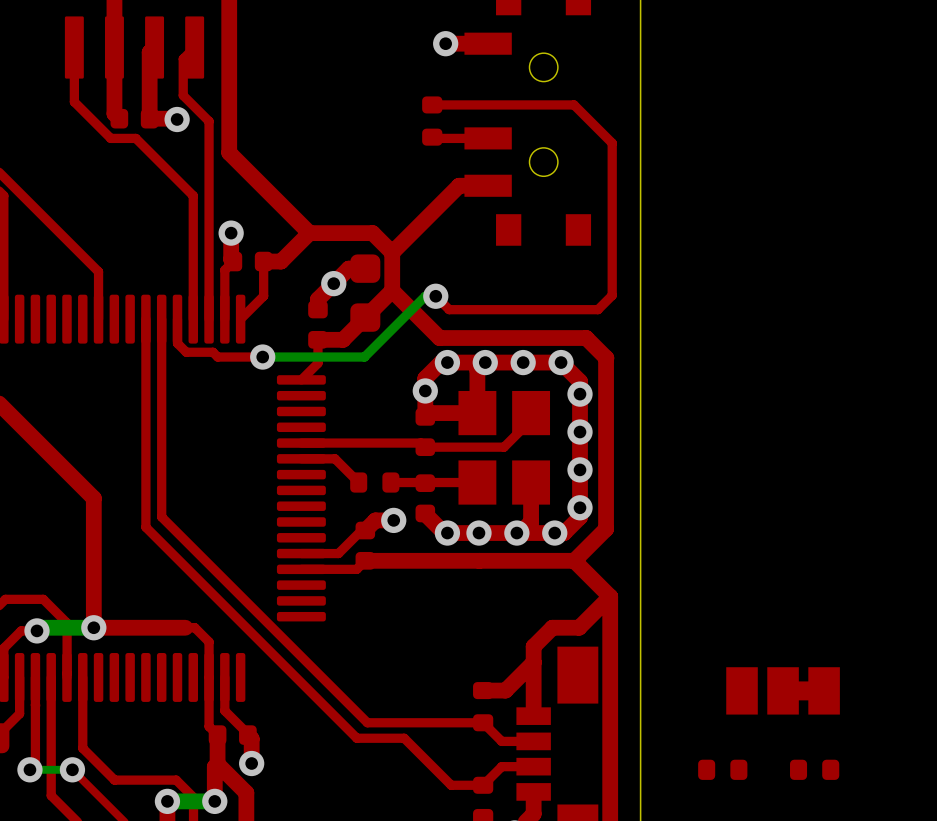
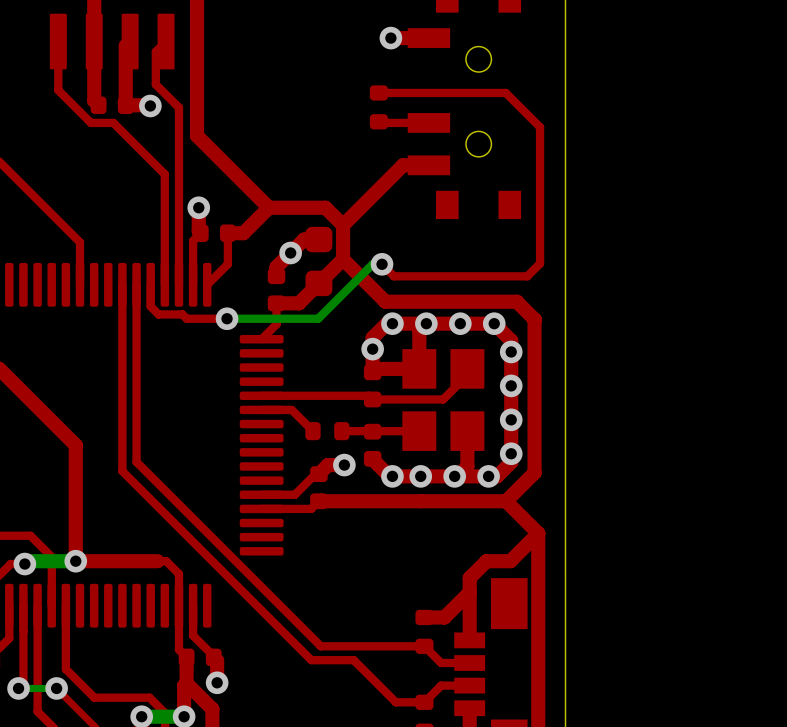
part: (783, 690) -> none
part: (722, 769) -> none
part: (814, 769) -> none

